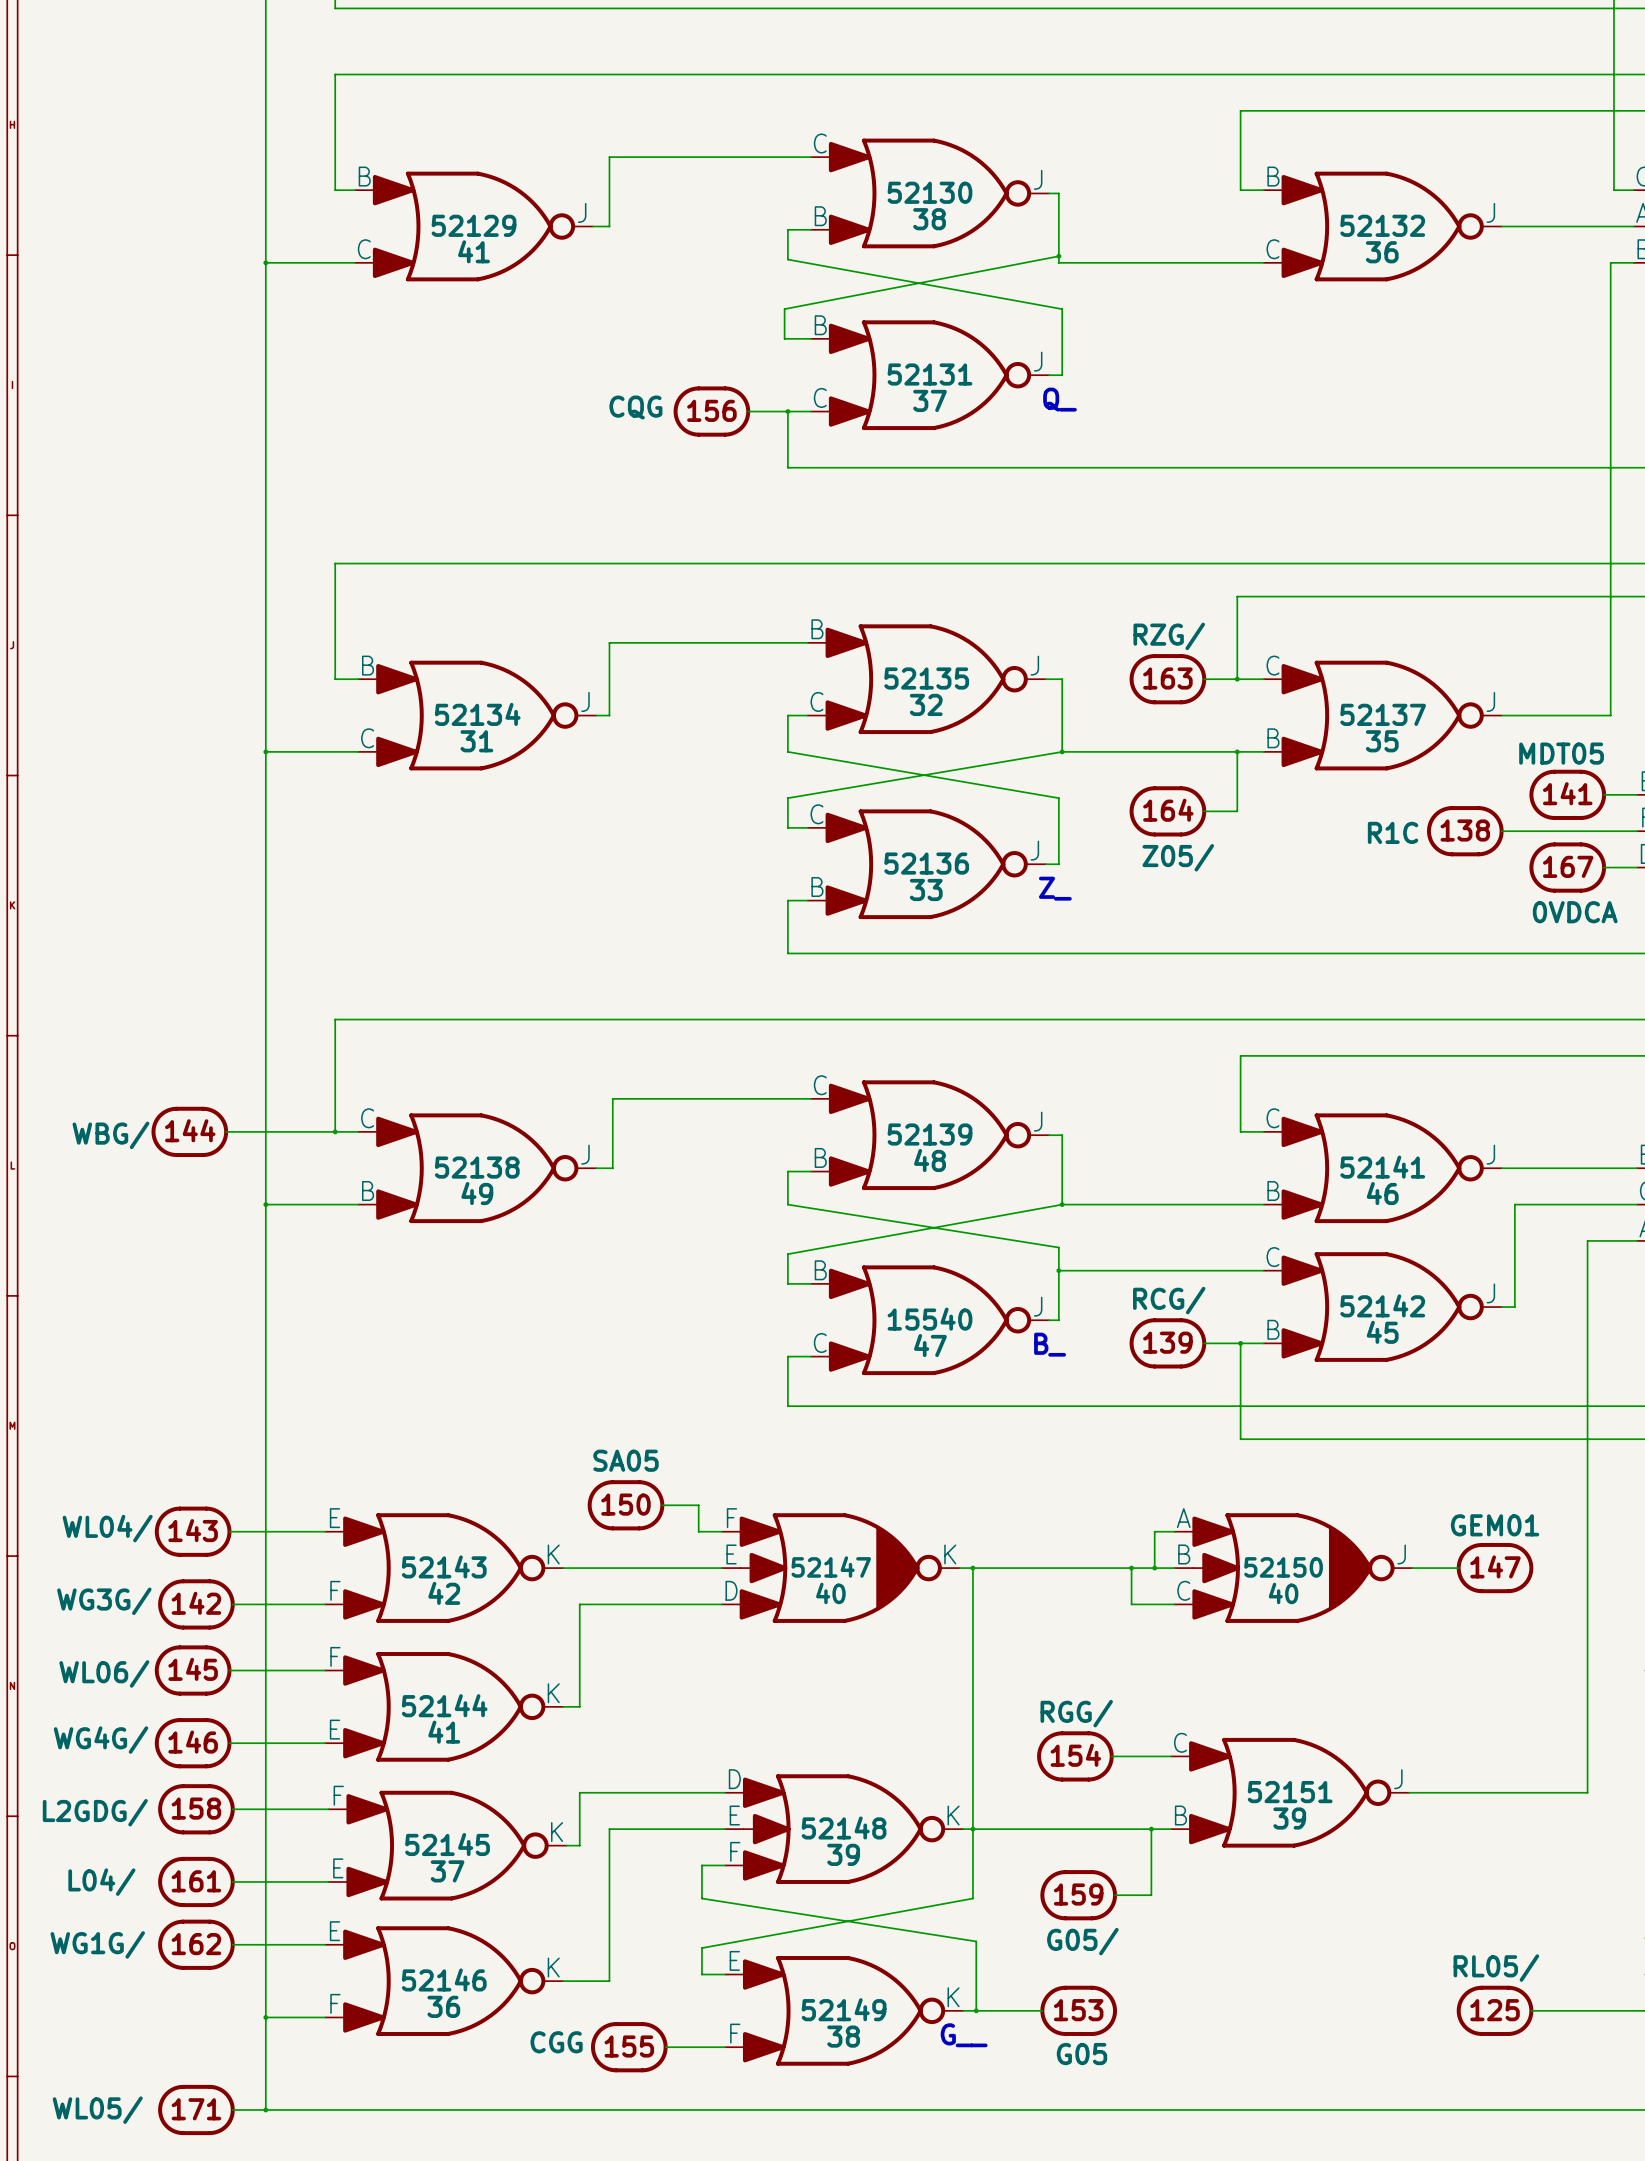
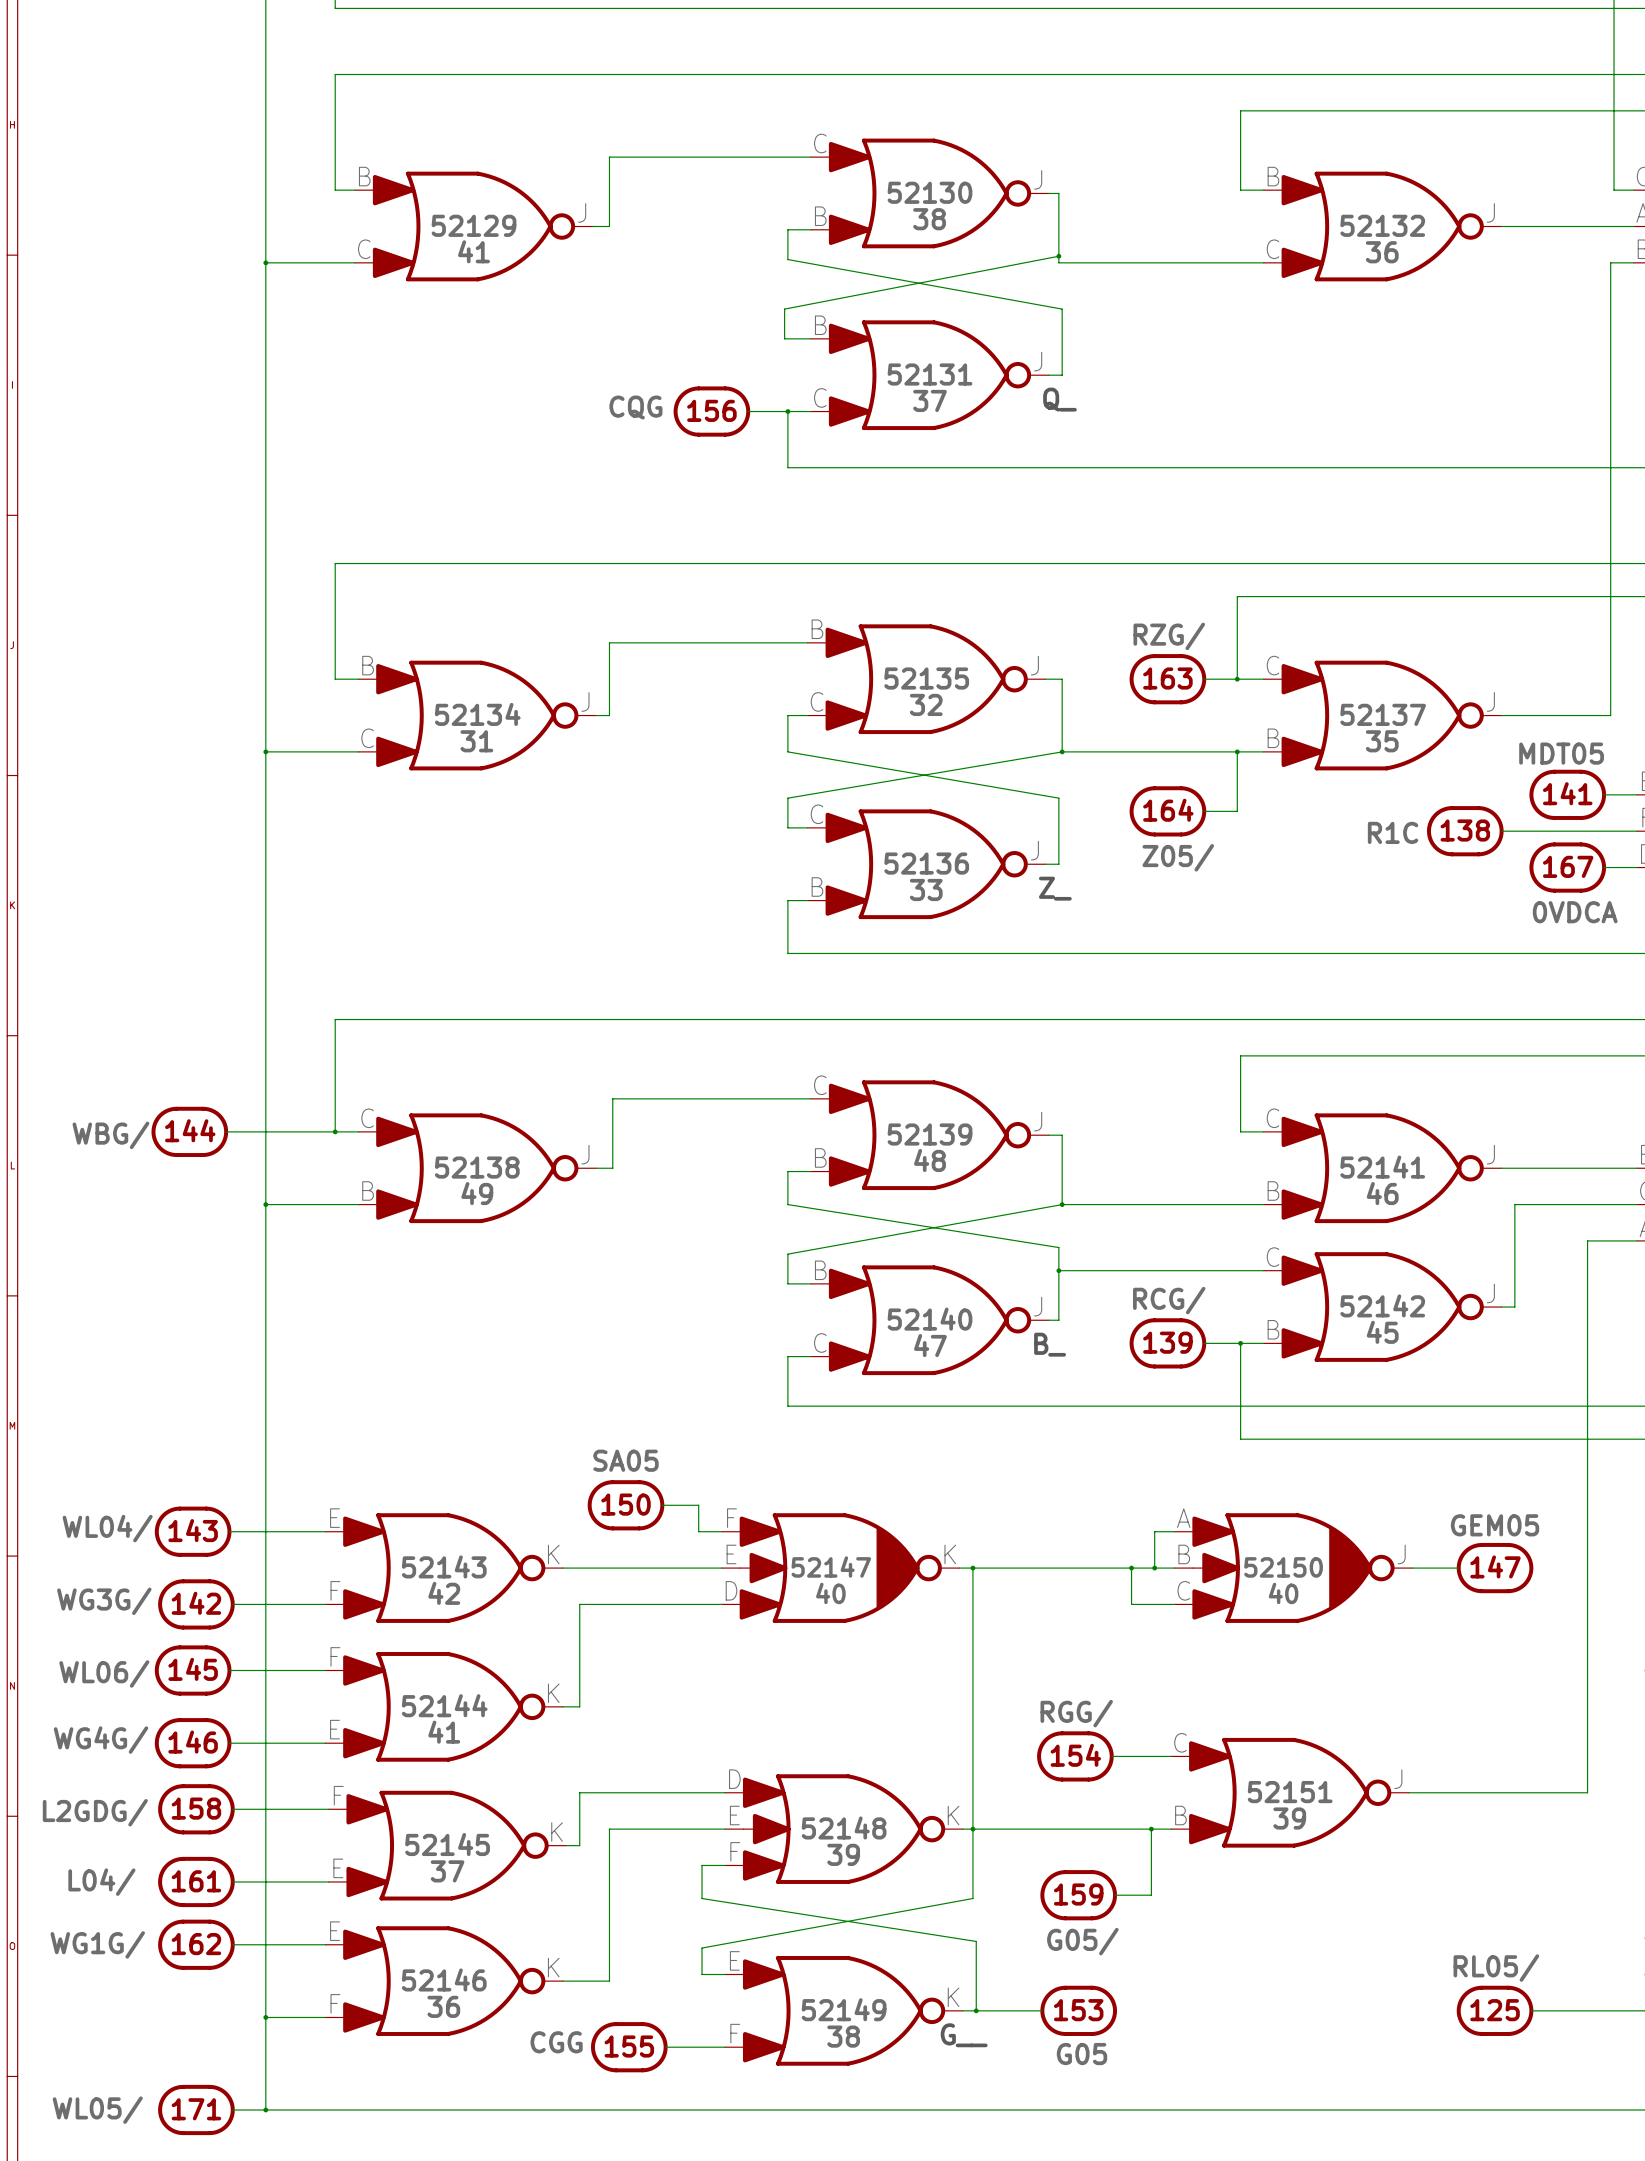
part text: 15540 (929, 1319) -> 52140 (929, 1319)
part text: GEM01 (1495, 1525) -> GEM05 (1495, 1525)

